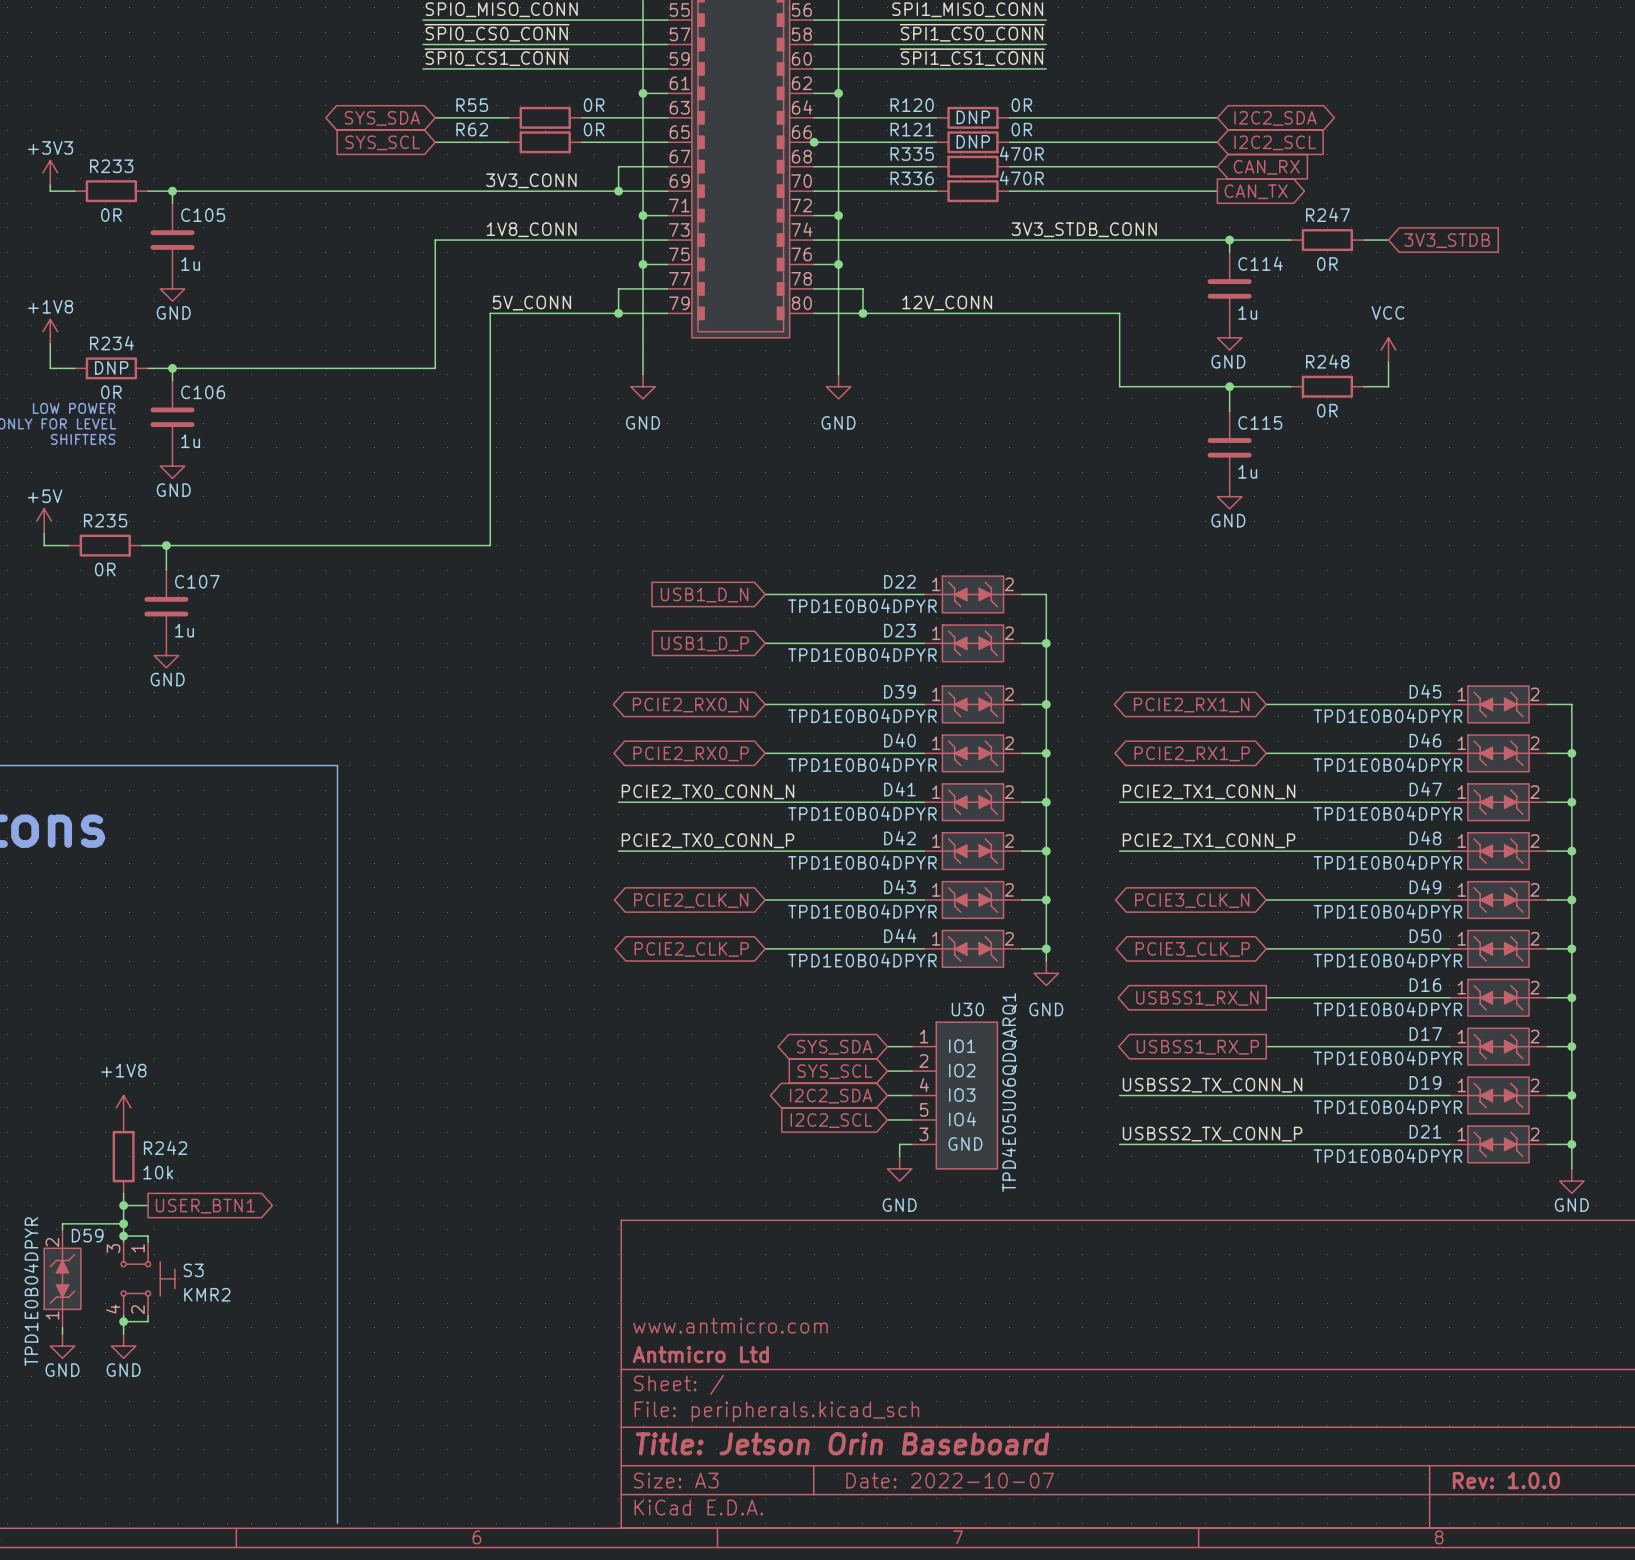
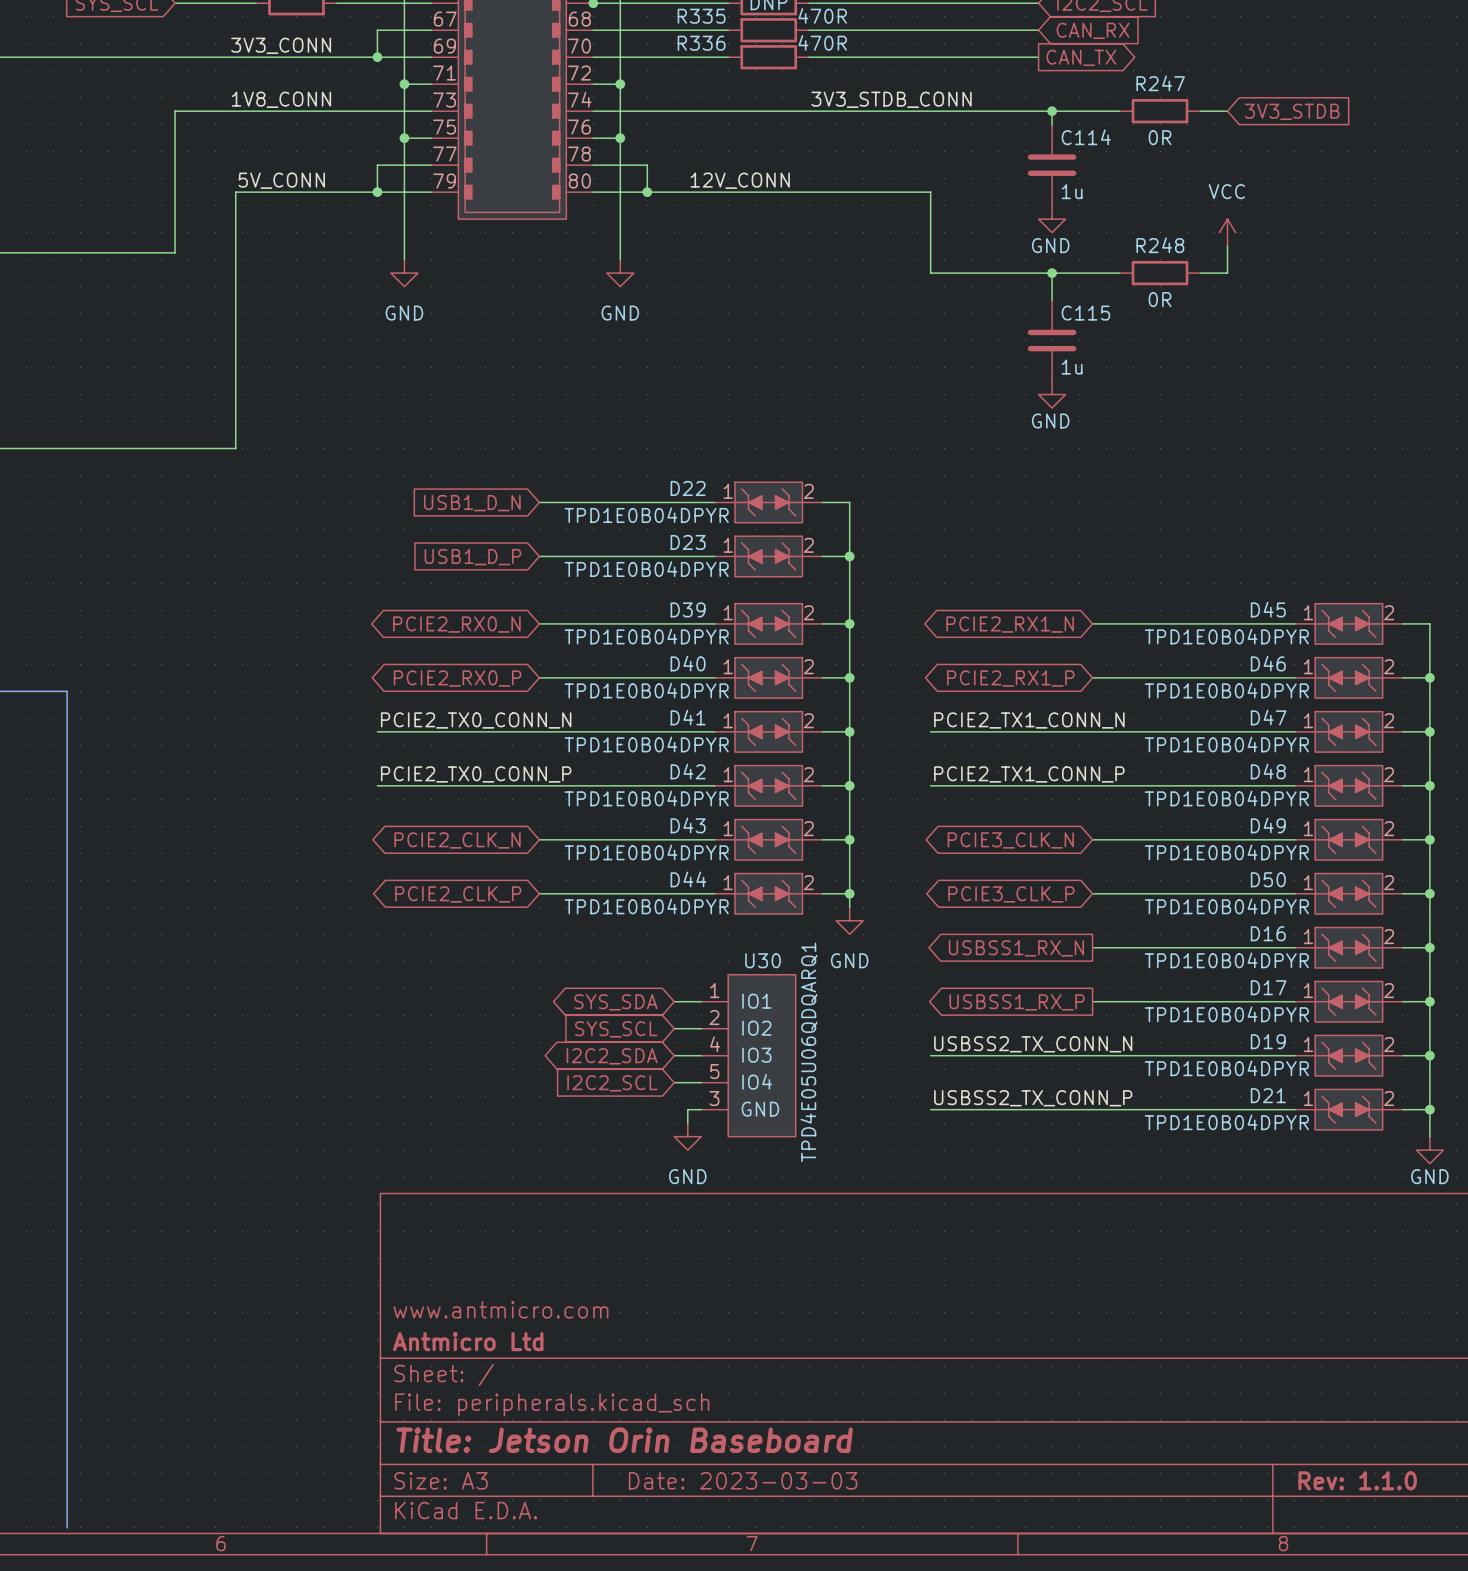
title block: Date: 2022-10-07 (950, 1480) -> Date: 2023-03-03 (743, 1480)
title block: Rev: 1.0.0 (1506, 1480) -> Rev: 1.1.0 (1357, 1480)

